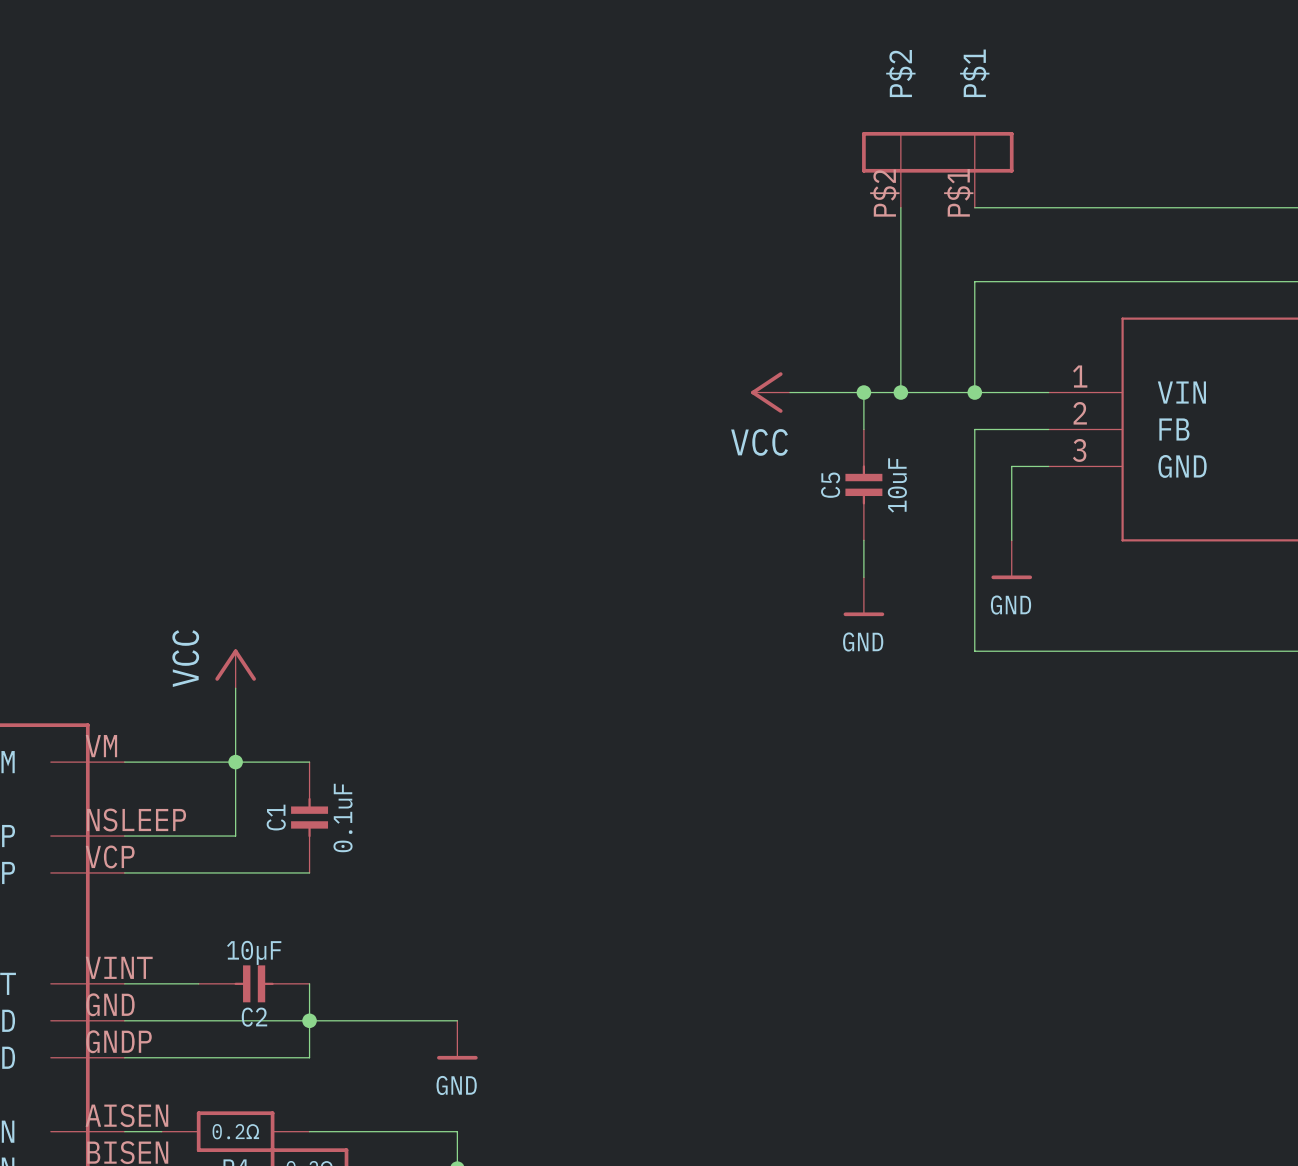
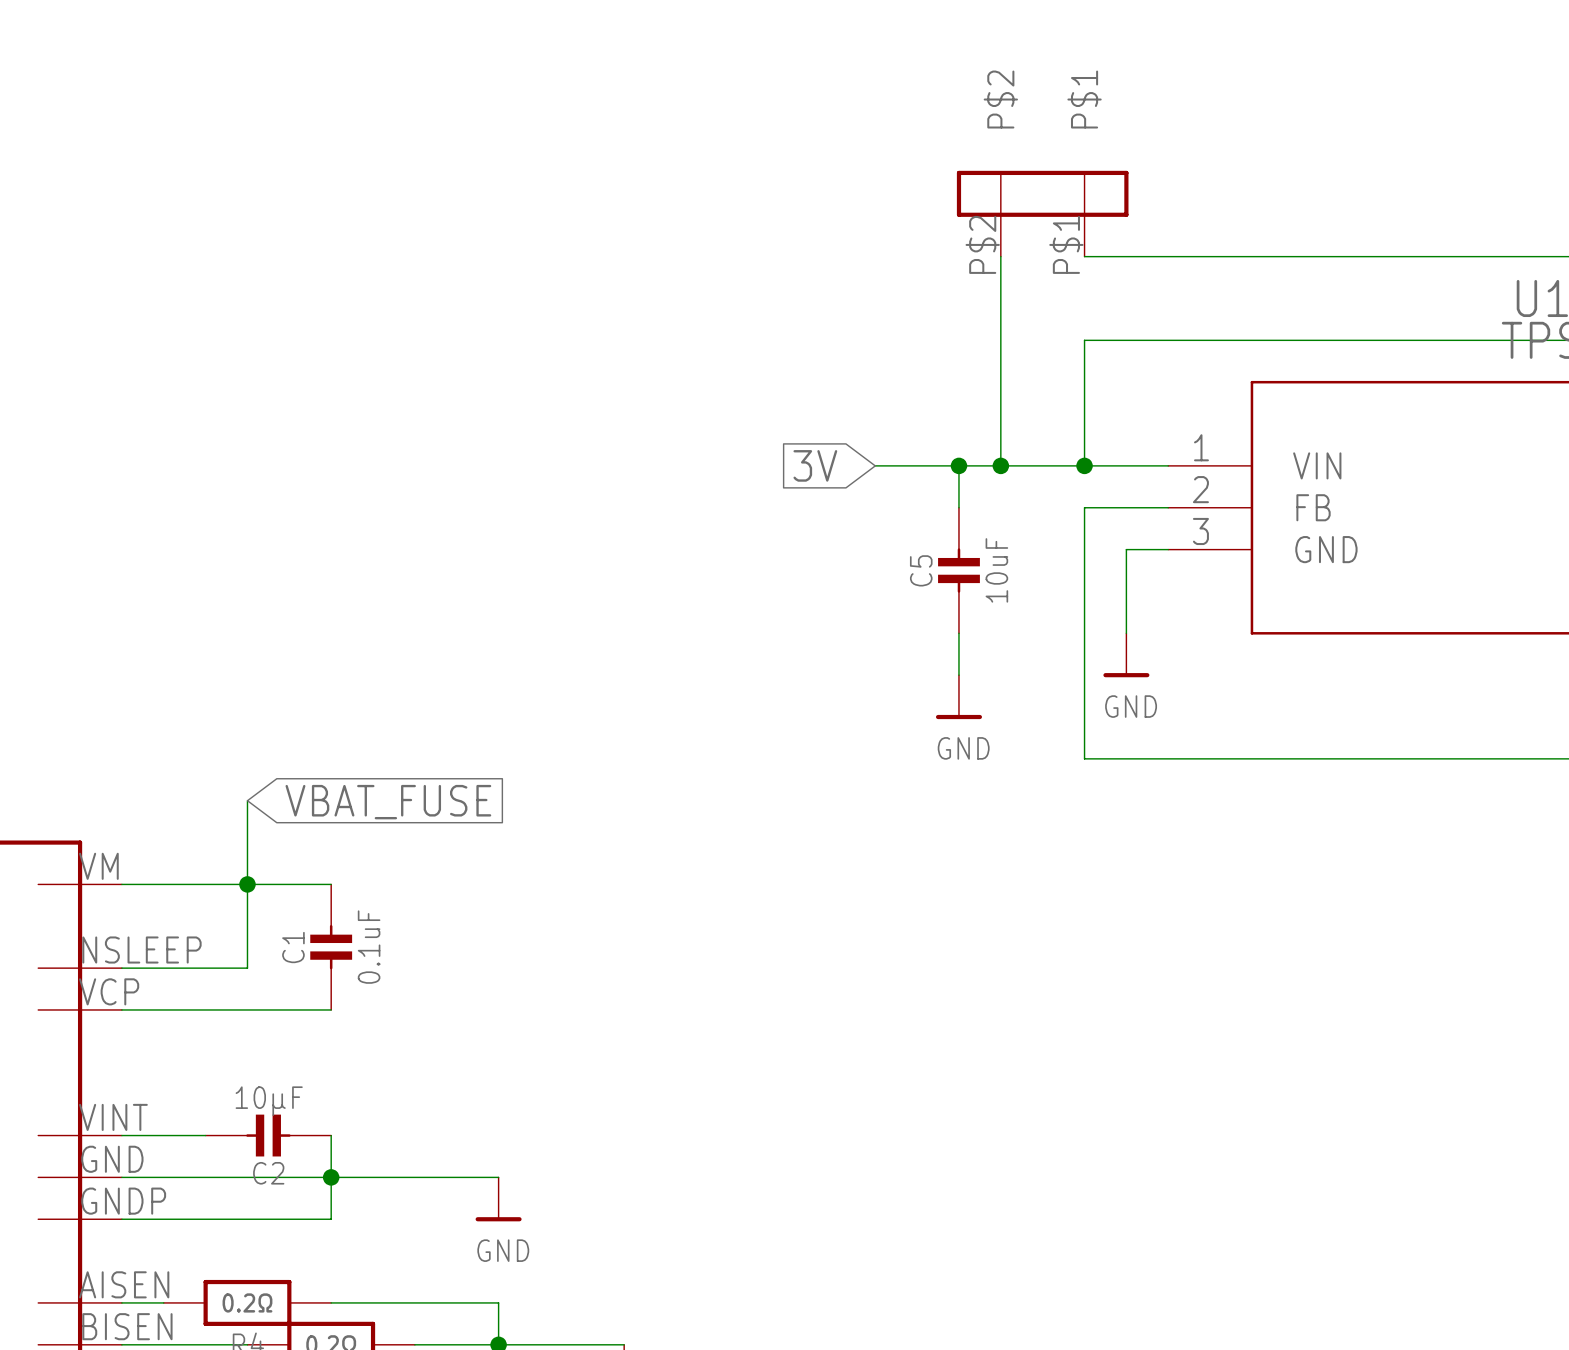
global label: none -> 3V (815, 465)
power symbol: VCC (770, 392) -> none
power symbol: VCC (235, 668) -> none
global label: none -> VBAT_FUSE (388, 802)

